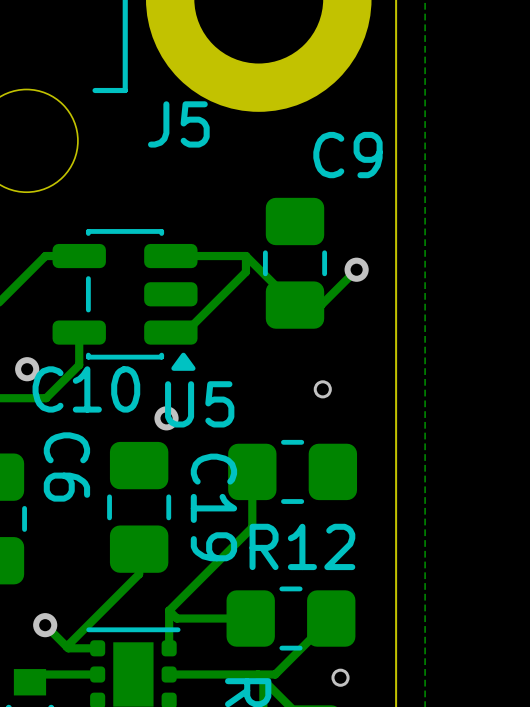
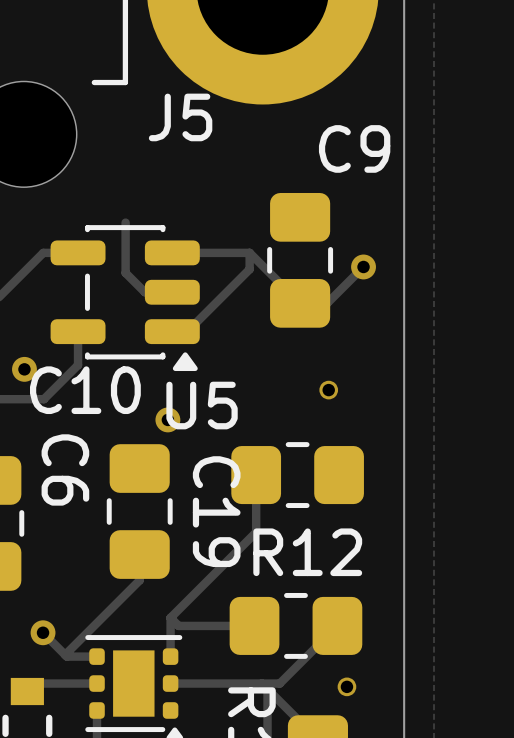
track: none -> (125, 222) (125, 272) (144, 292) (172, 292)

